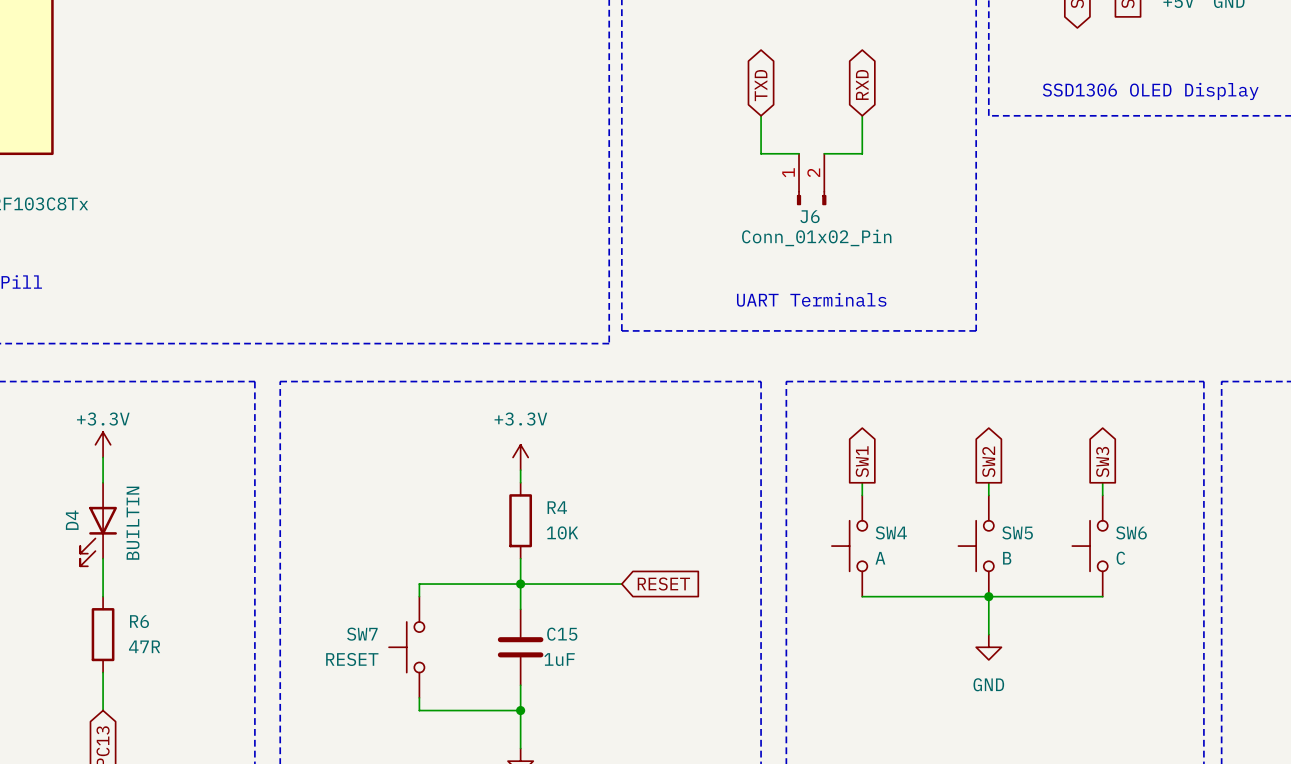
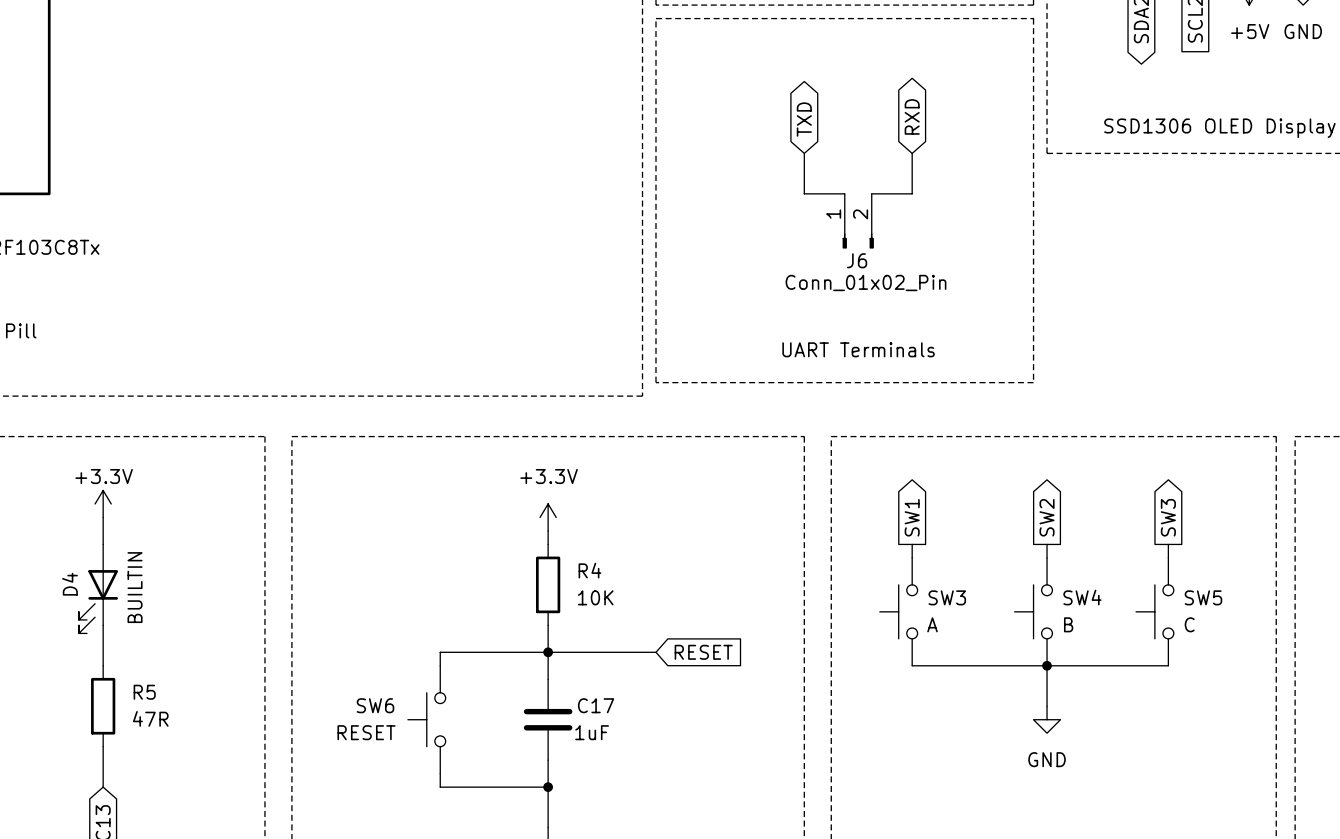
SW4 name: SW4 (891, 532) -> SW3 (947, 597)
SW5 name: SW5 (1017, 532) -> SW4 (1082, 597)
SW6 name: SW6 (1131, 532) -> SW5 (1203, 597)
R6 name: R6 (139, 621) -> R5 (144, 692)
SW7 name: SW7 (362, 634) -> SW6 (375, 705)
C15 name: C15 (562, 634) -> C17 (596, 705)

